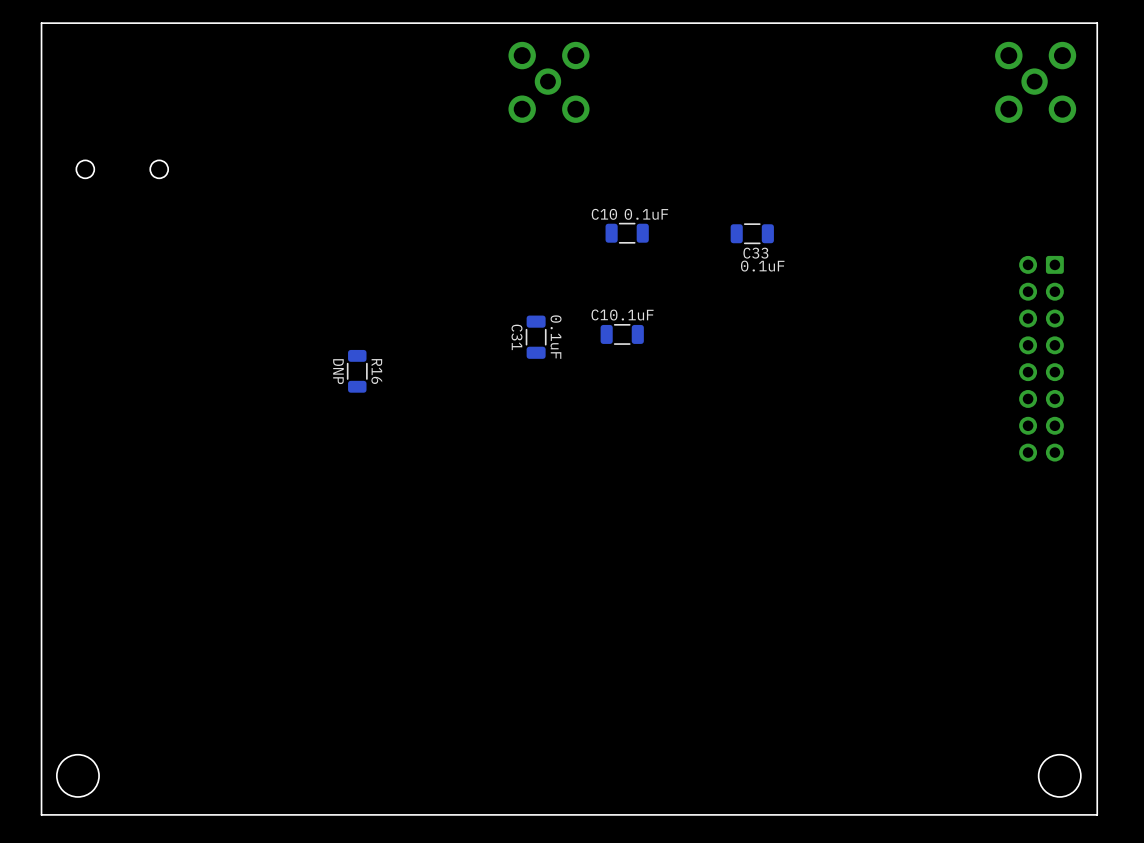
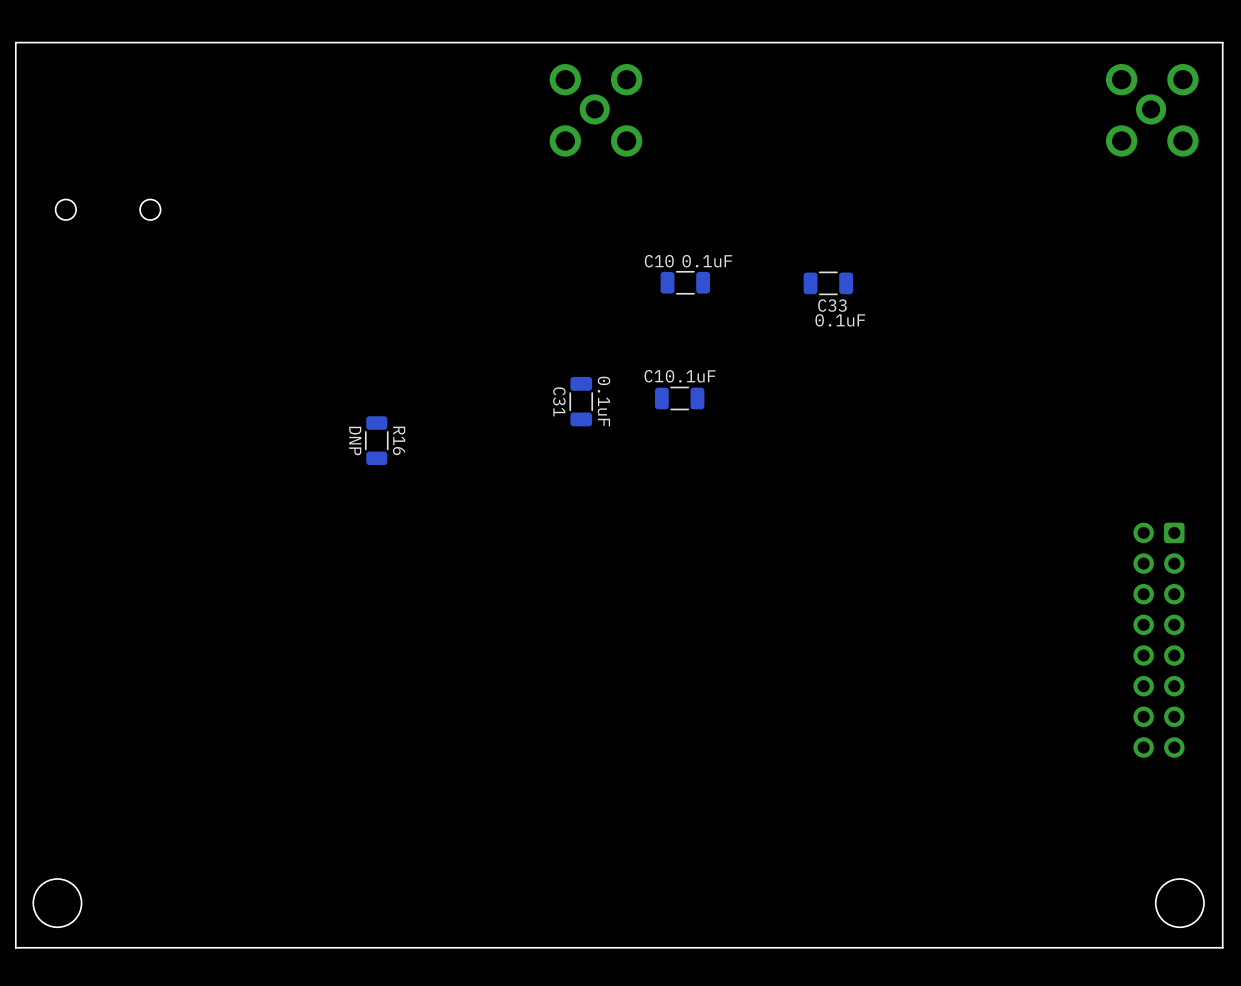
part position: (1041, 358) -> (1158, 640)

